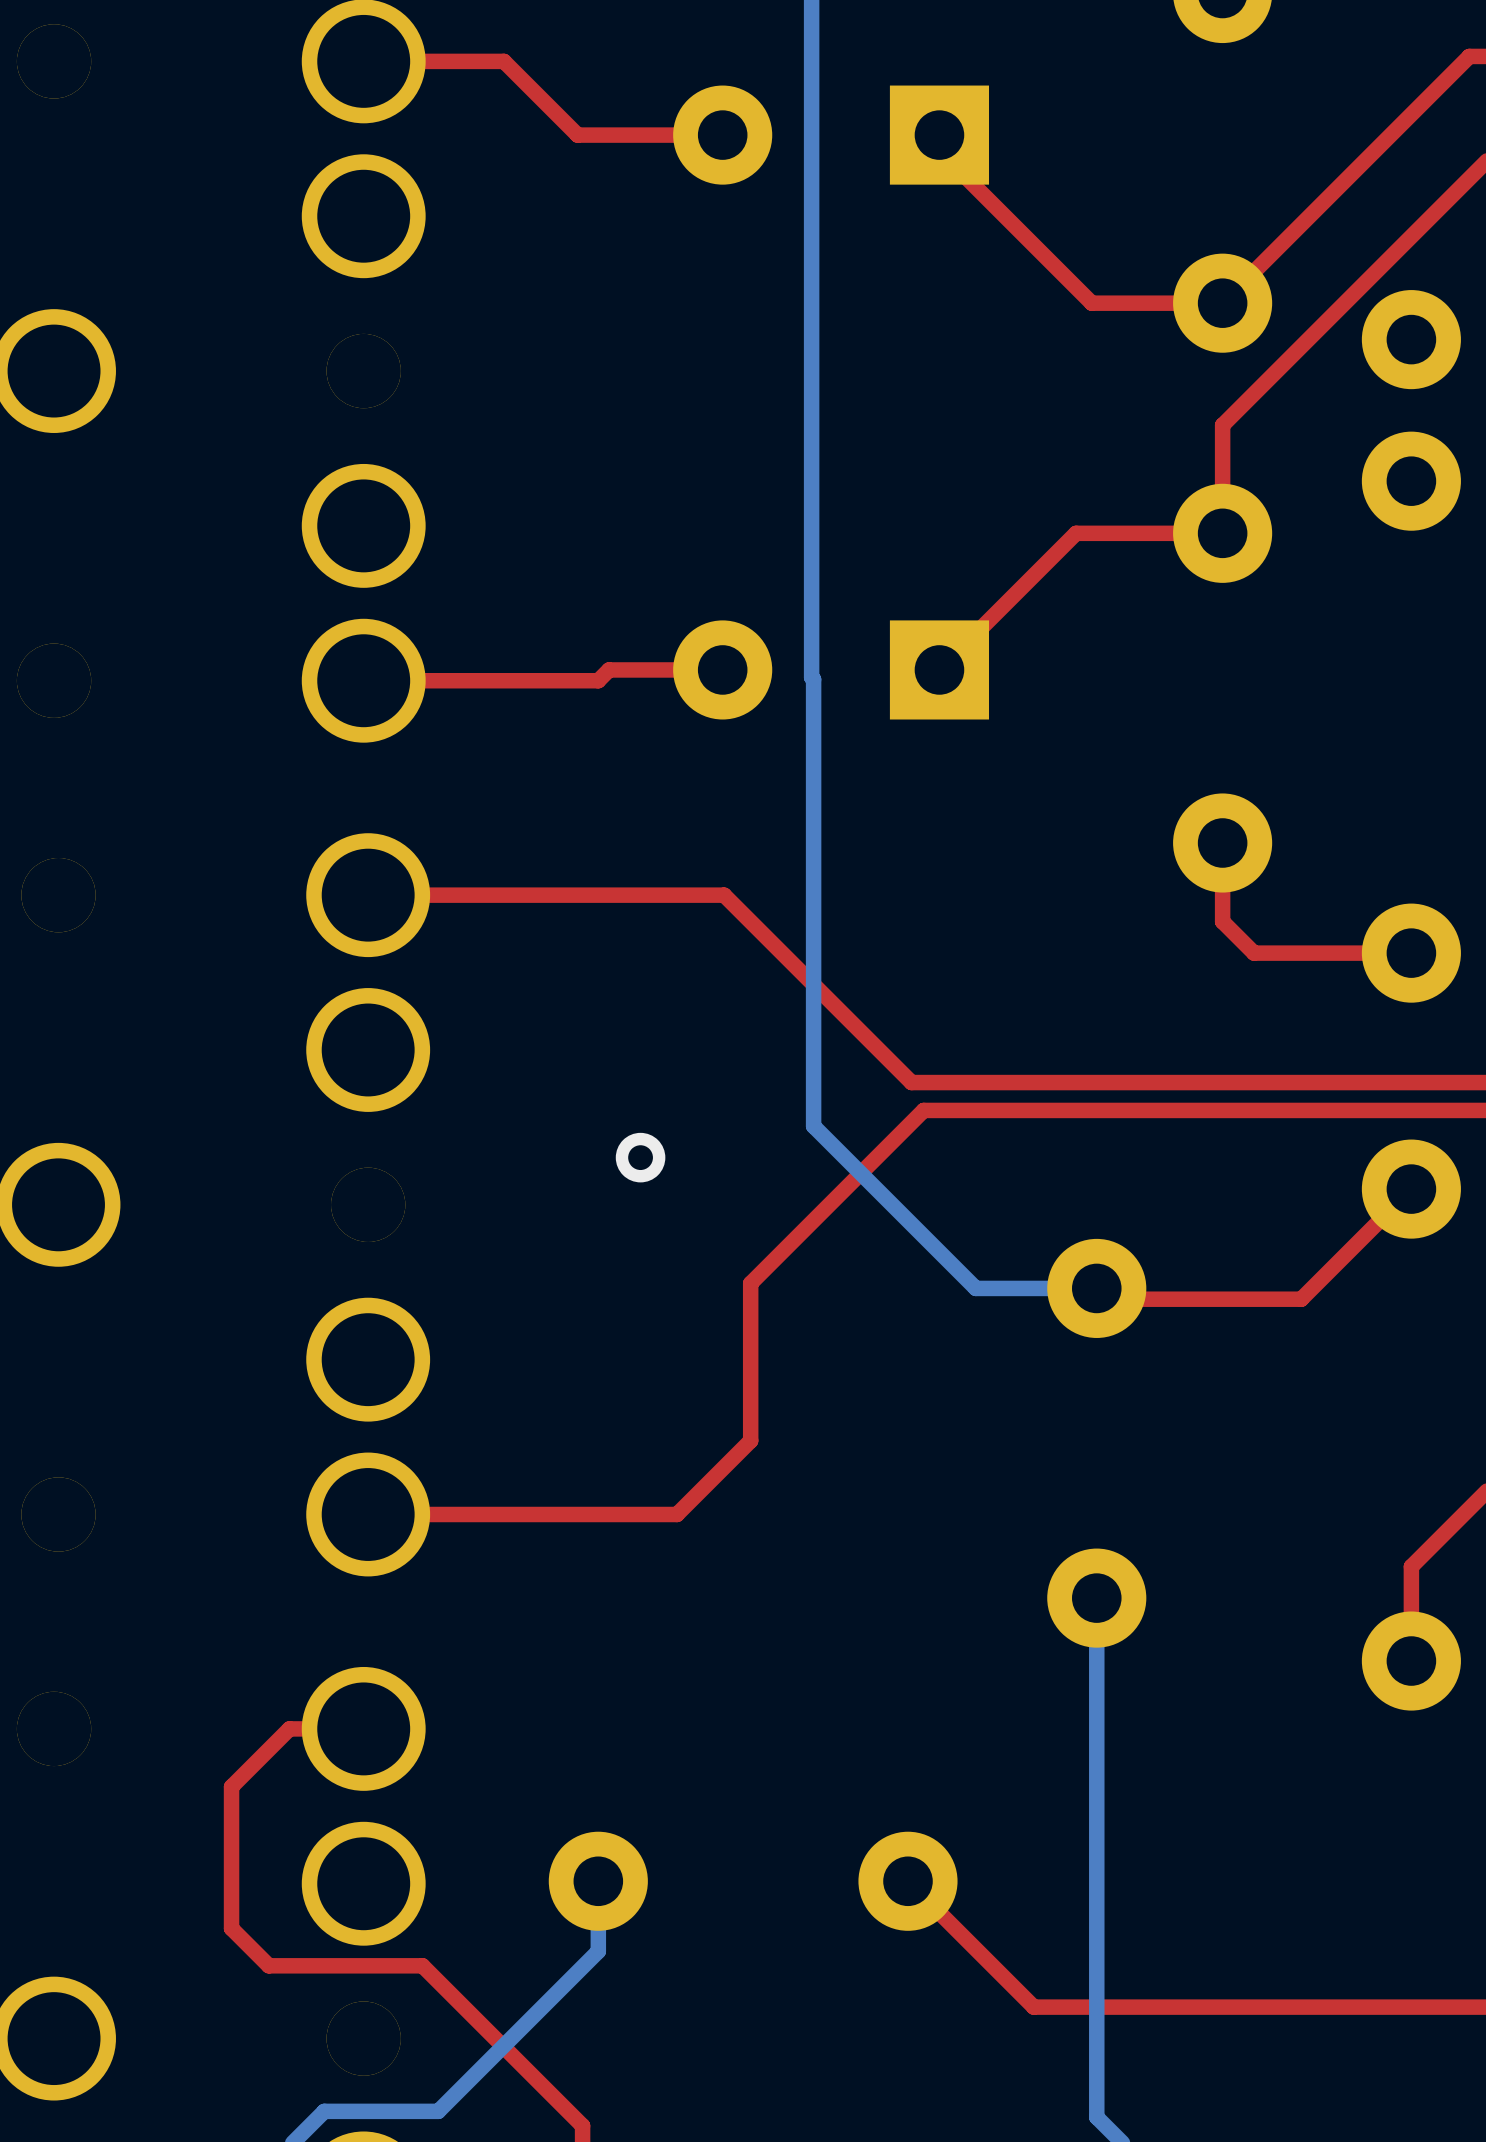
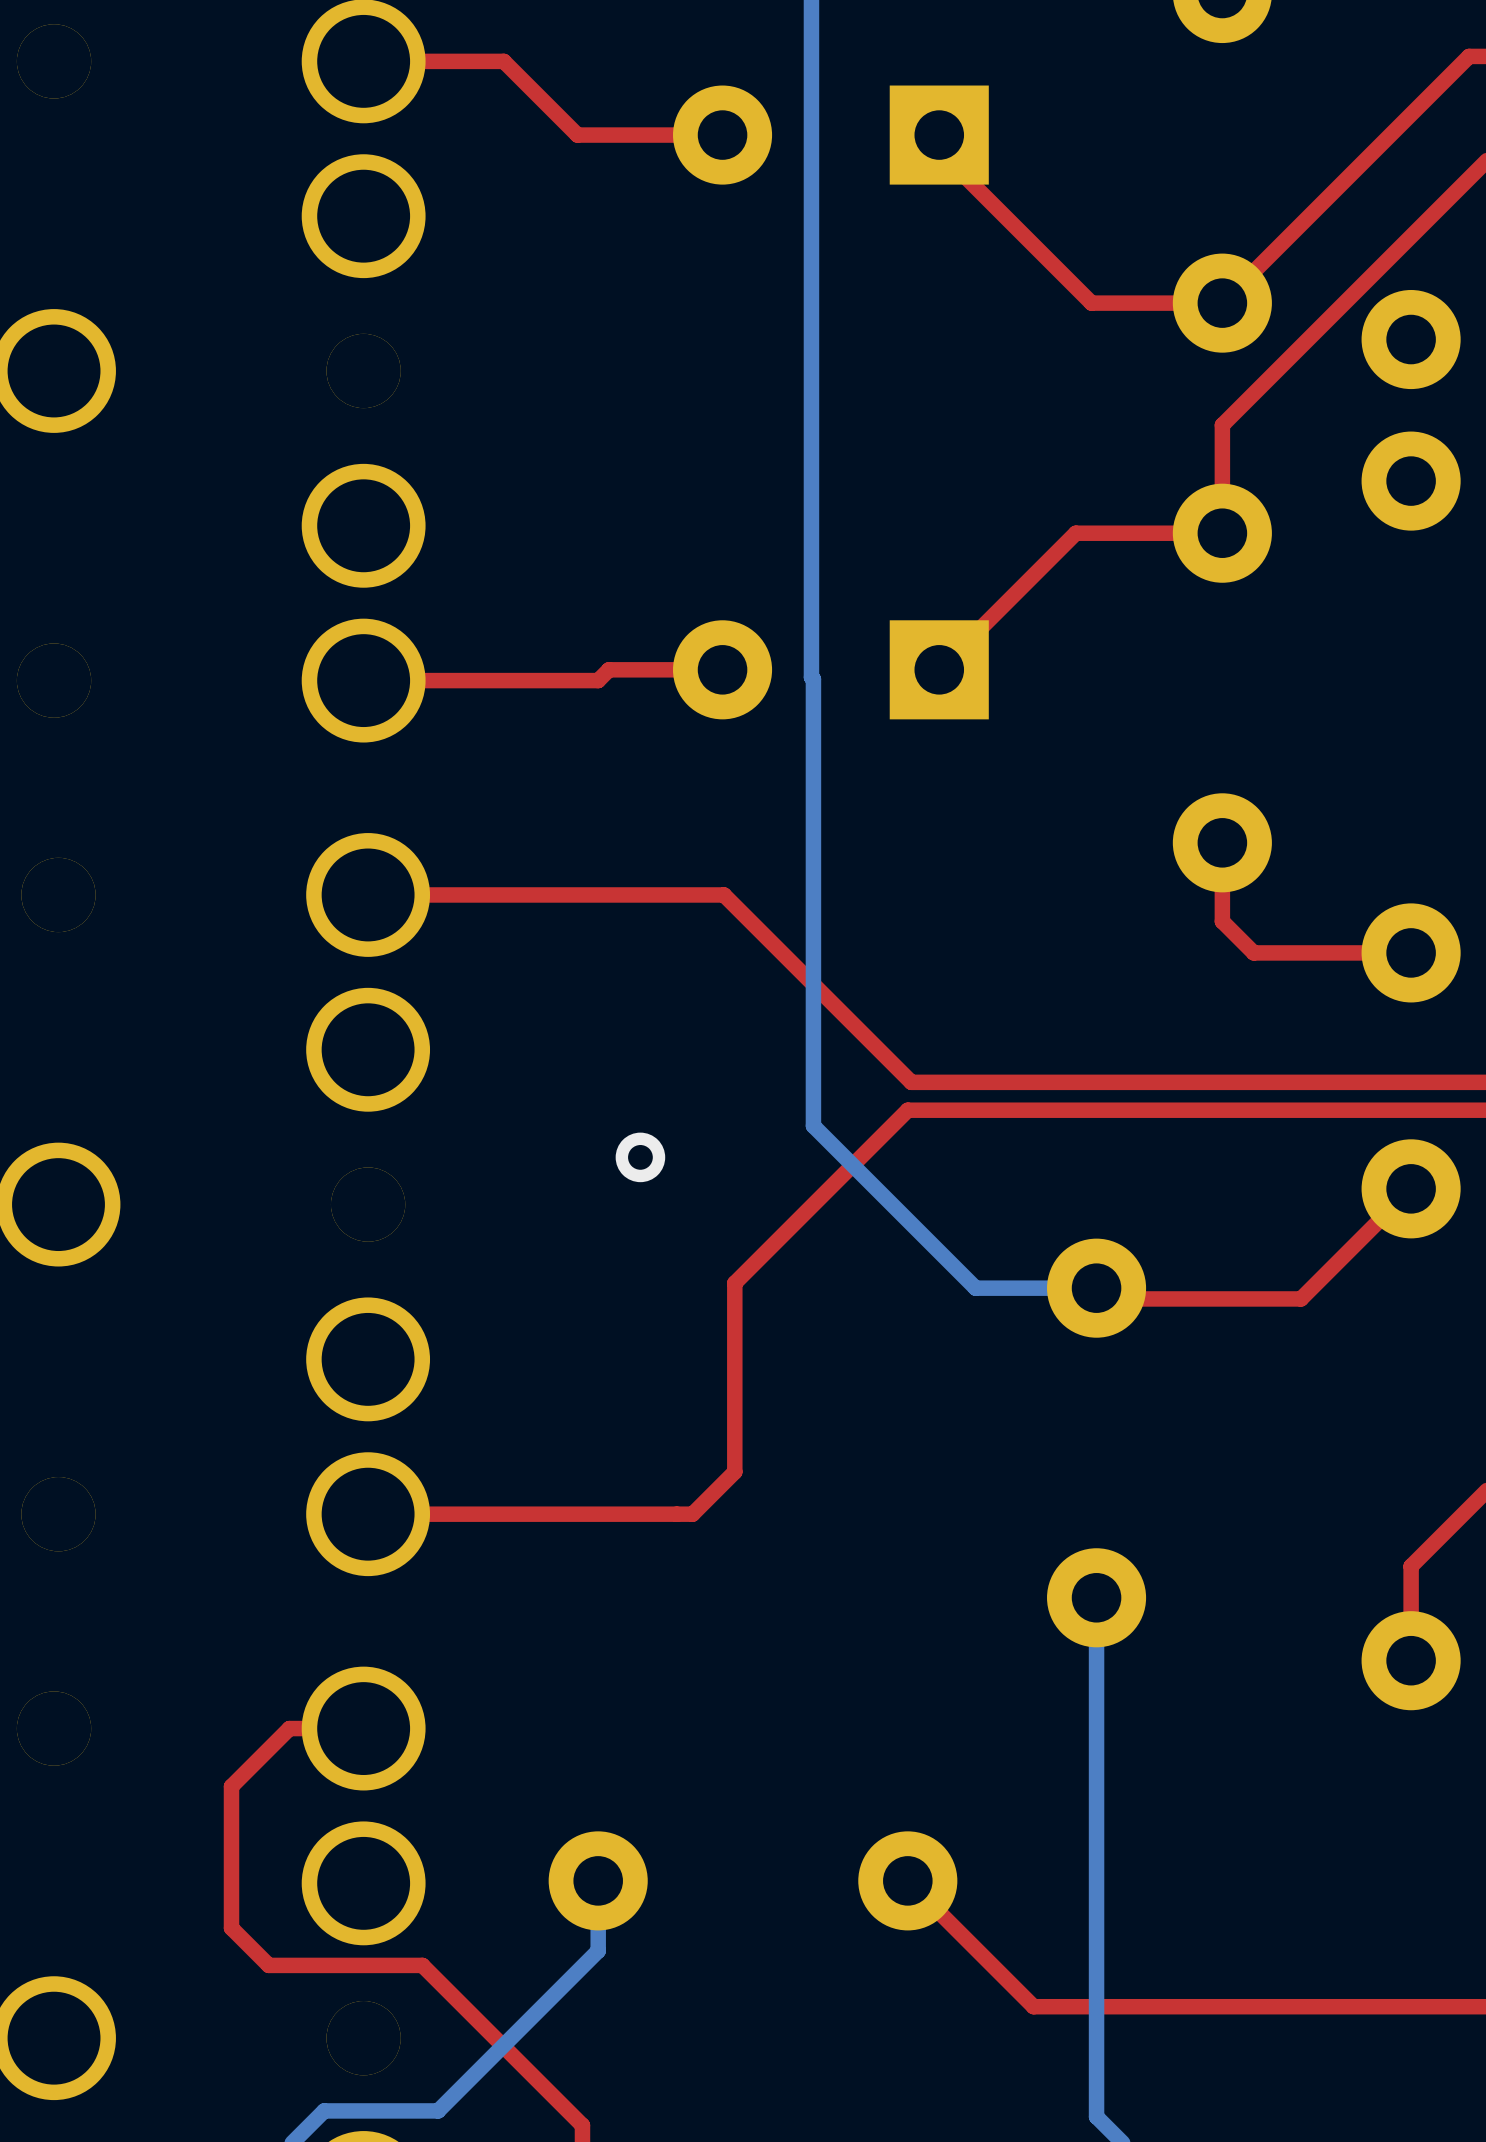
top track: (923, 1110) (750, 1283) (750, 1440) (676, 1514) -> (923, 1110) (907, 1110) (734, 1283) (734, 1471) (692, 1514) (676, 1514)

